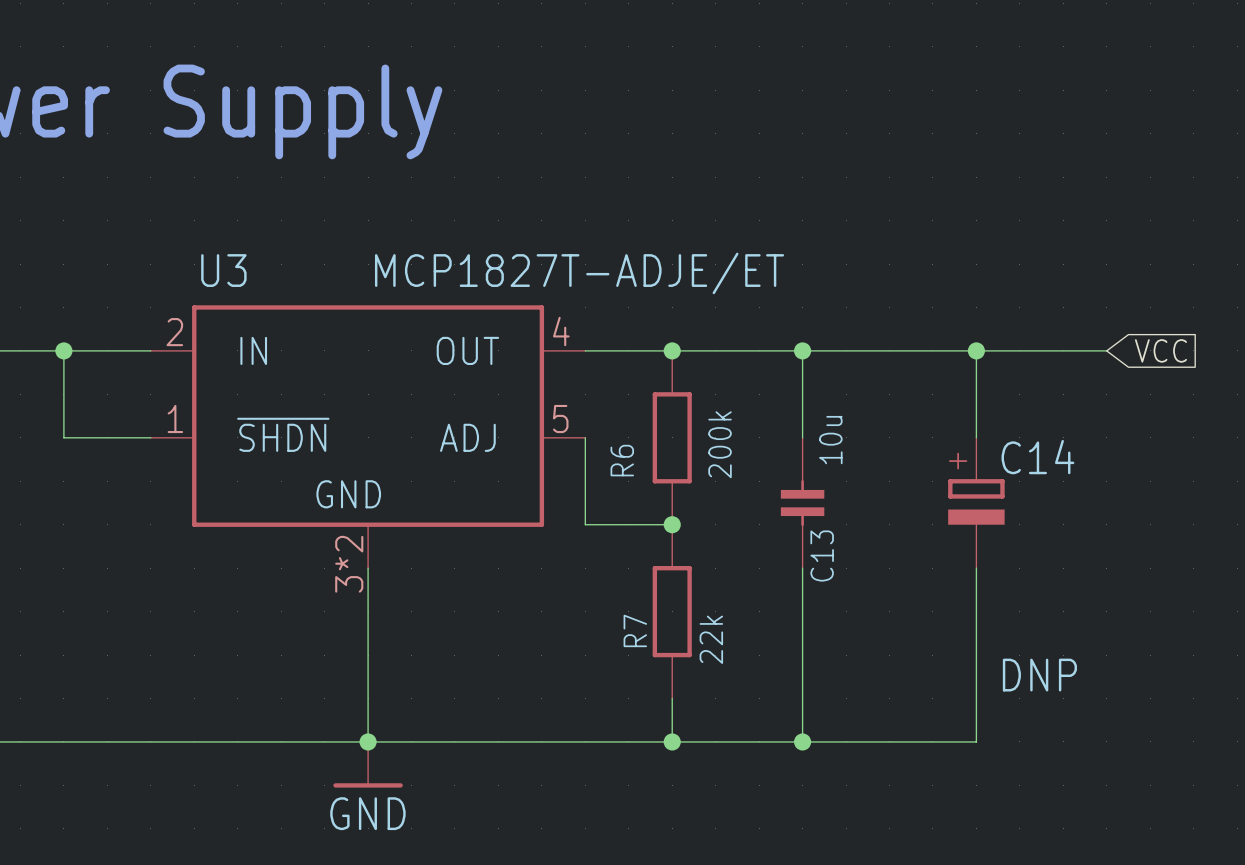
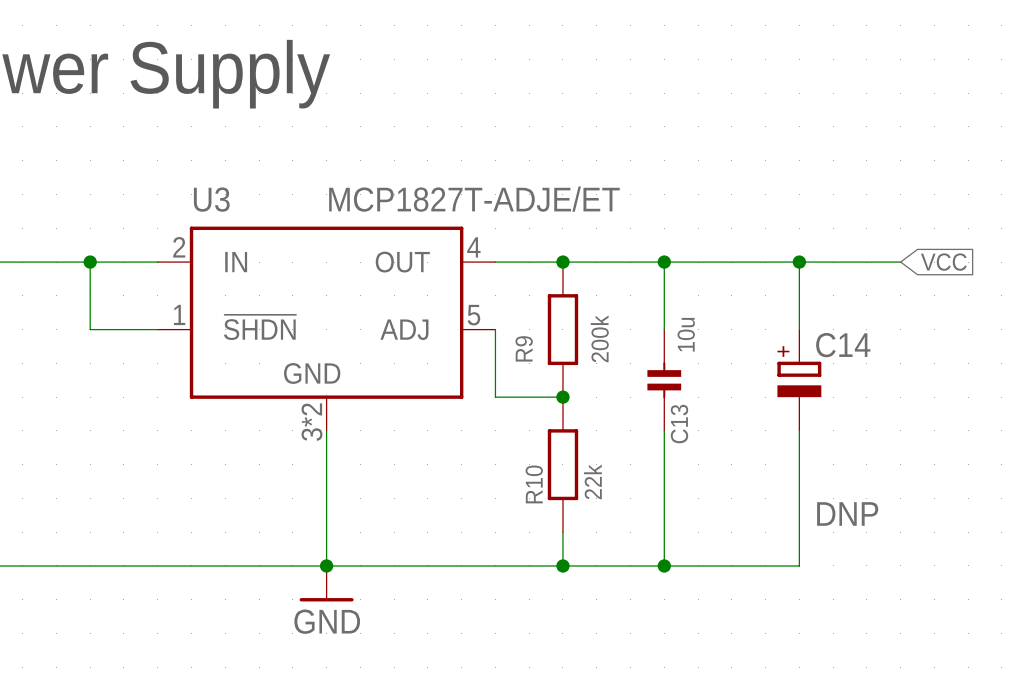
R6 name: R6 (622, 460) -> R9 (524, 348)
R7 name: R7 (635, 630) -> R10 (534, 484)

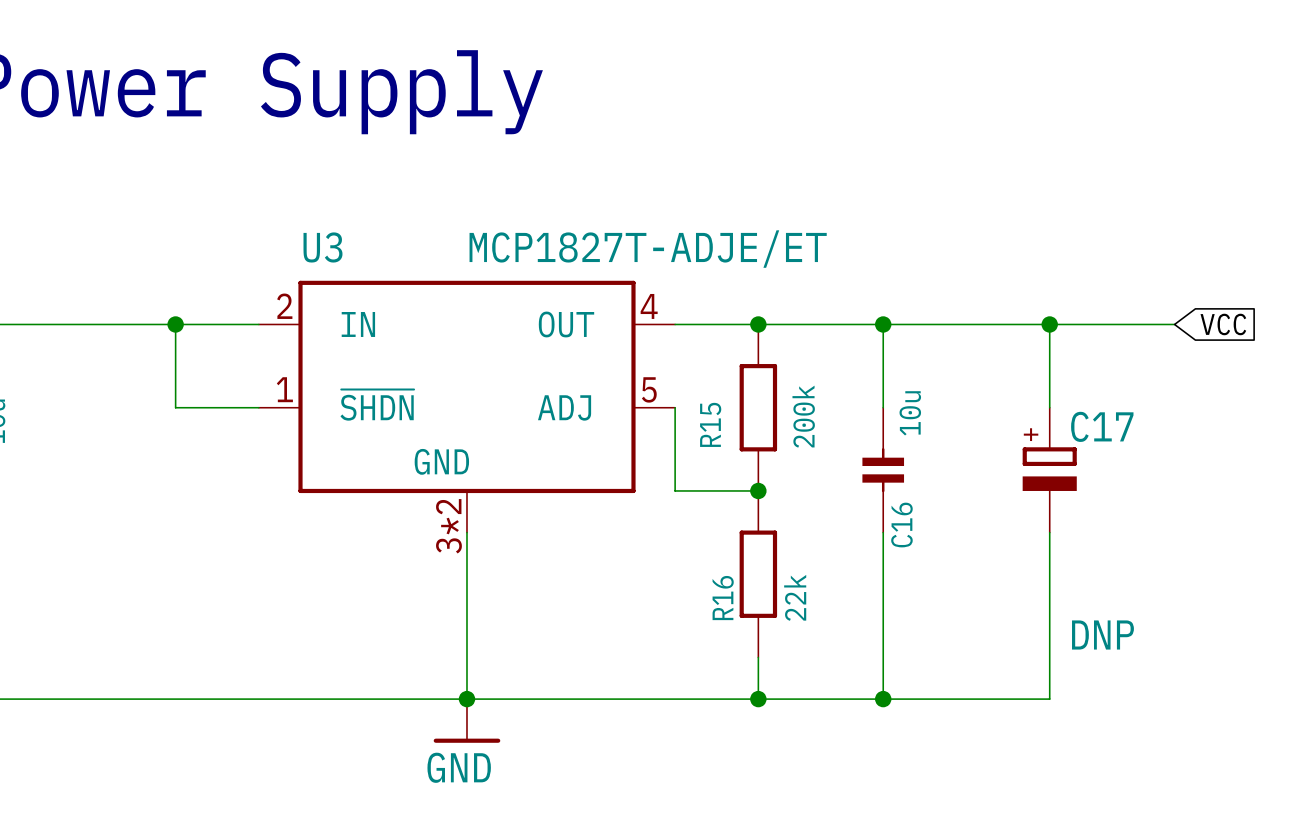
C14 name: C14 (843, 345) -> C17 (1102, 426)
R9 name: R9 (524, 348) -> R15 (710, 424)
C13 name: C13 (679, 424) -> C16 (901, 525)
R10 name: R10 (534, 484) -> R16 (723, 598)

